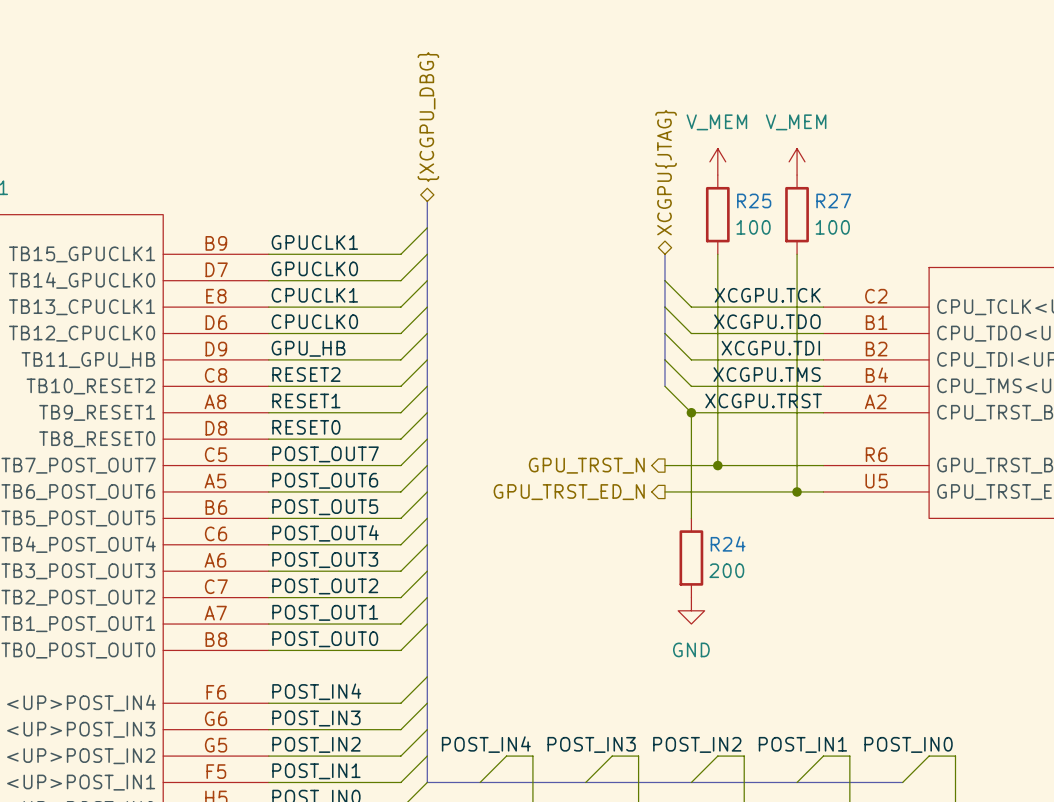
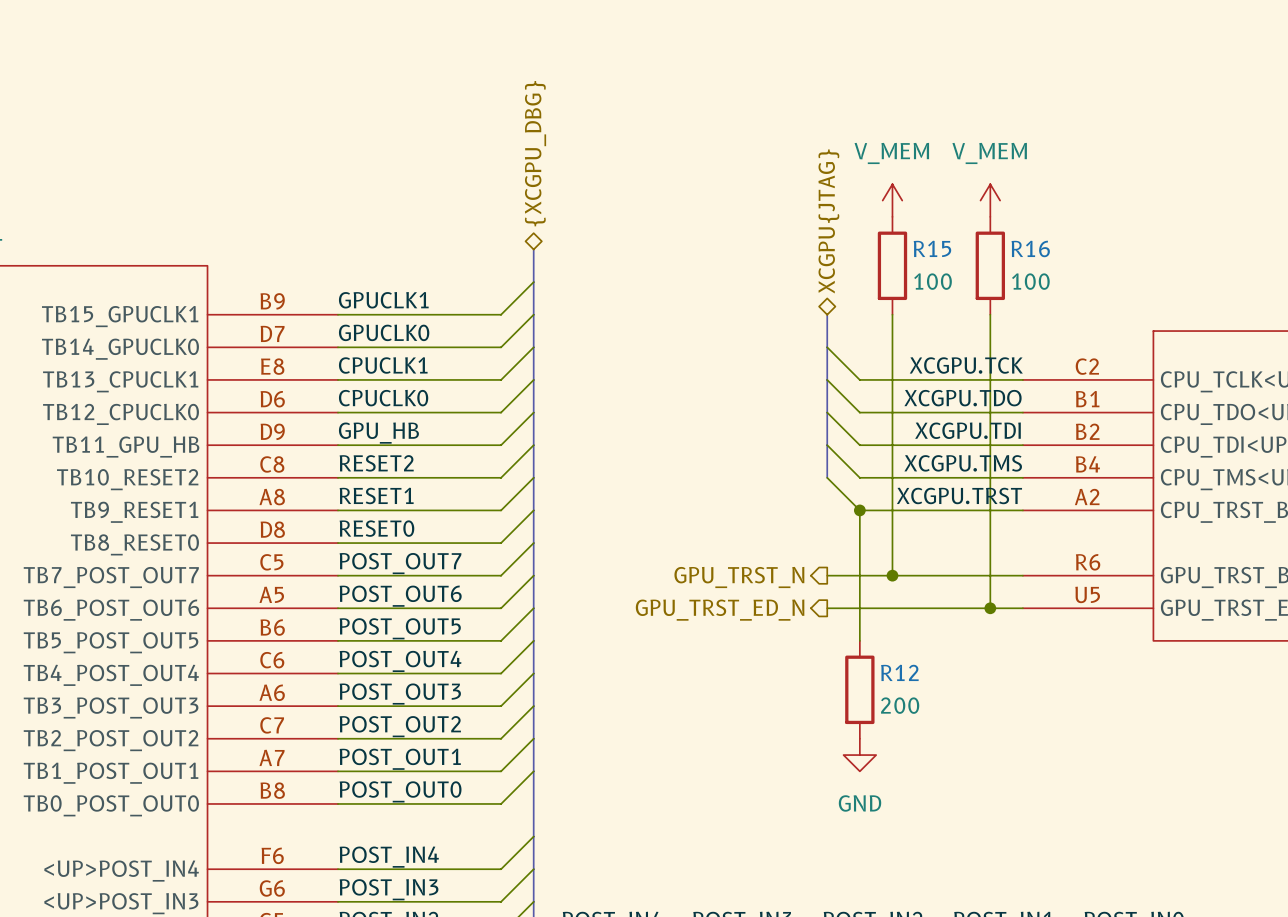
R25 name: R25 (754, 200) -> R15 (932, 248)
R27 name: R27 (833, 200) -> R16 (1030, 248)
R24 name: R24 (728, 543) -> R12 (899, 672)

